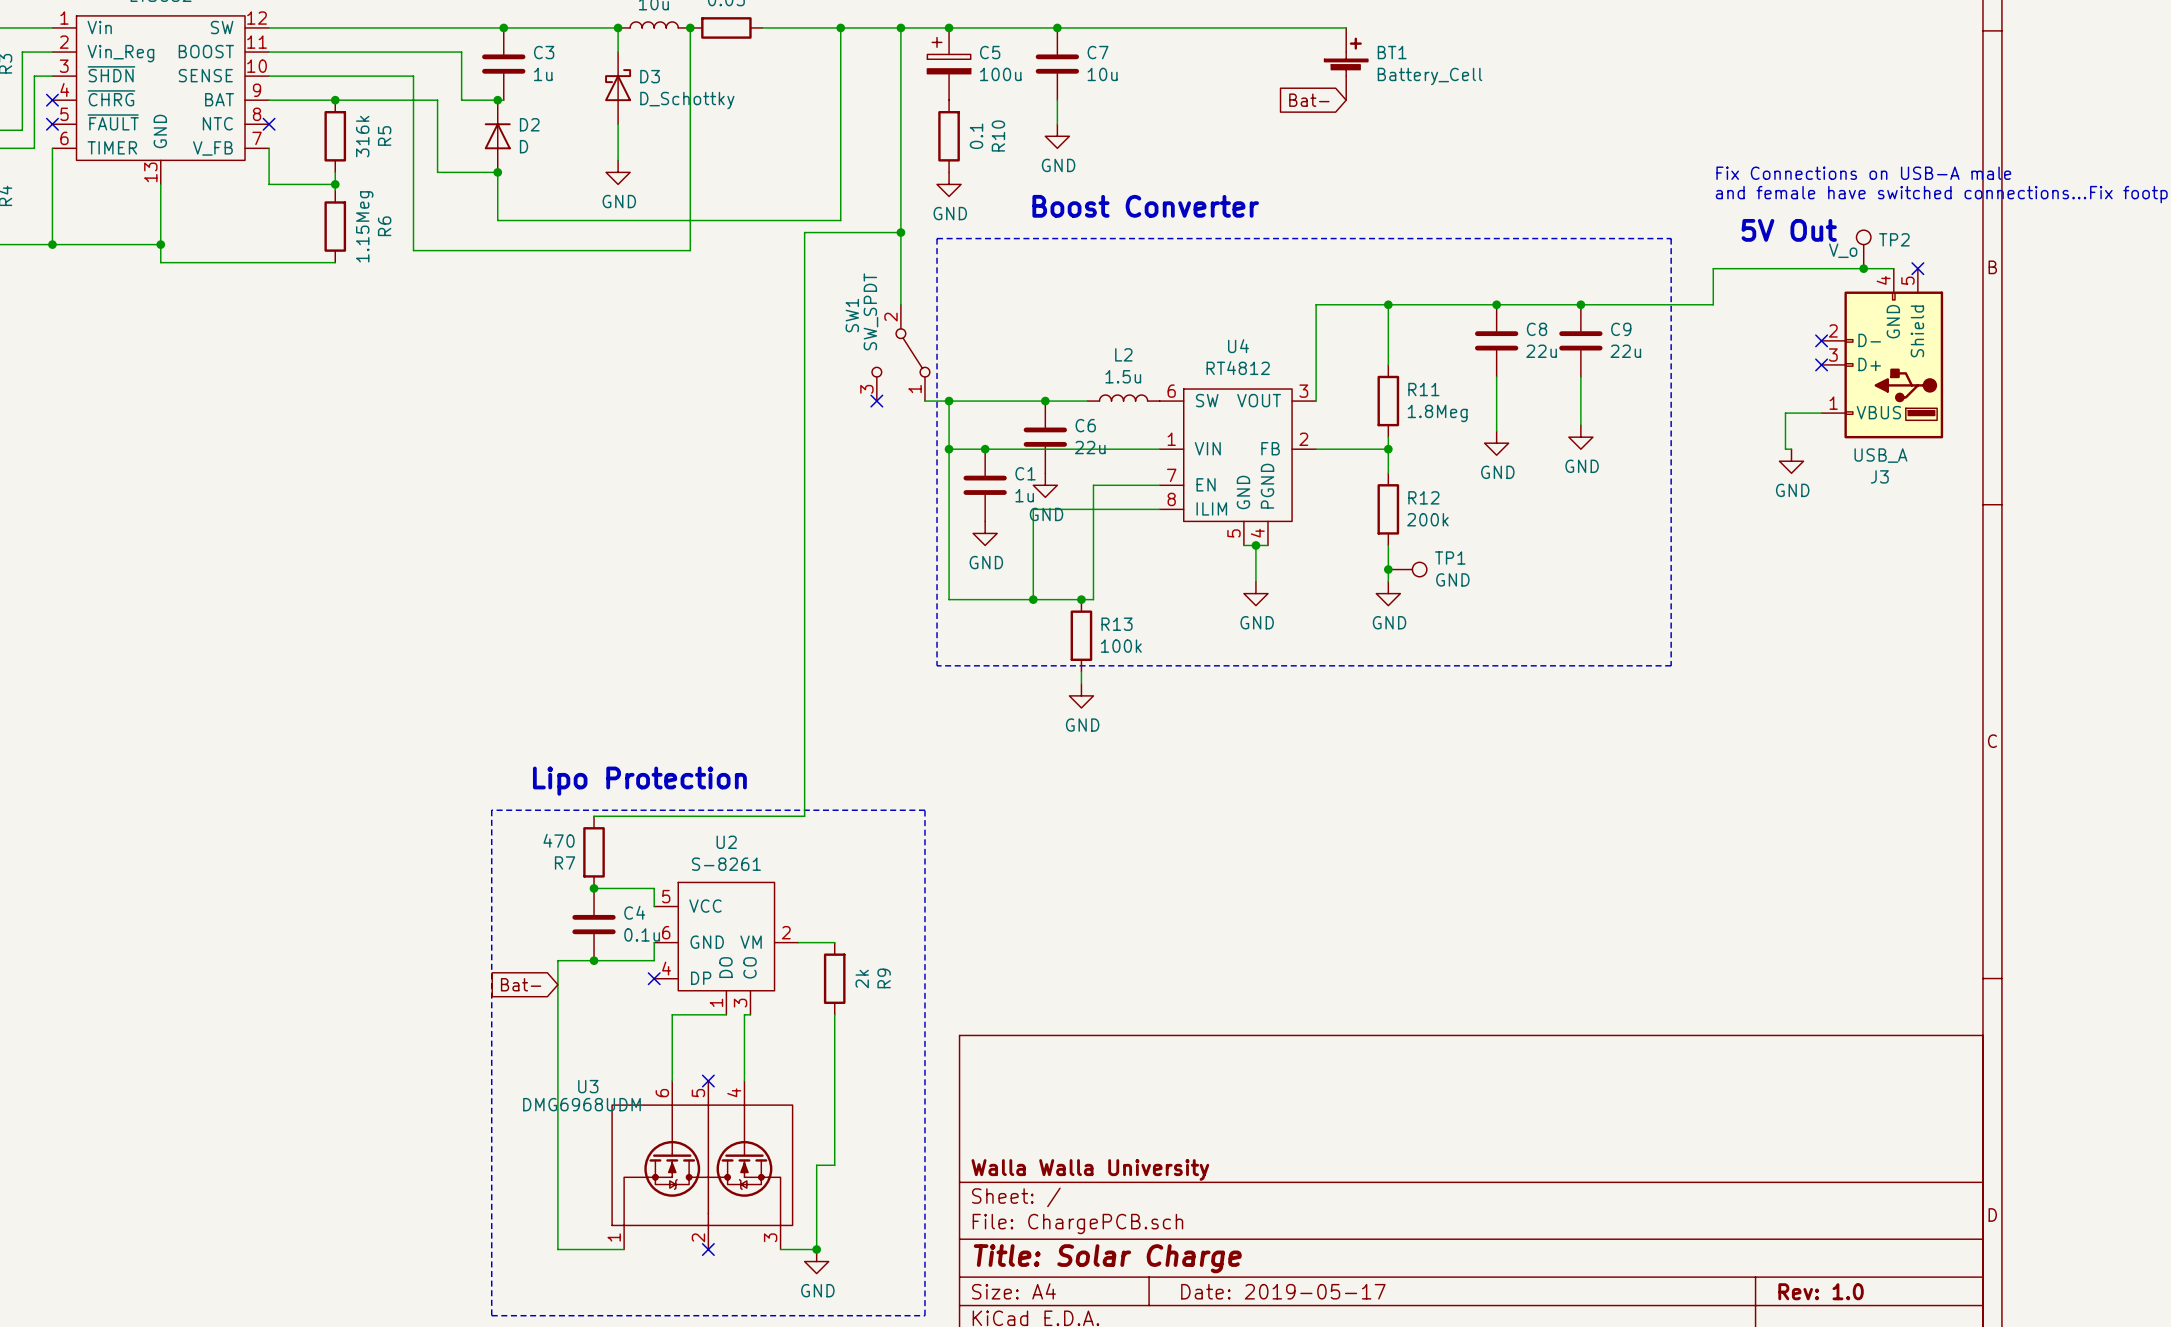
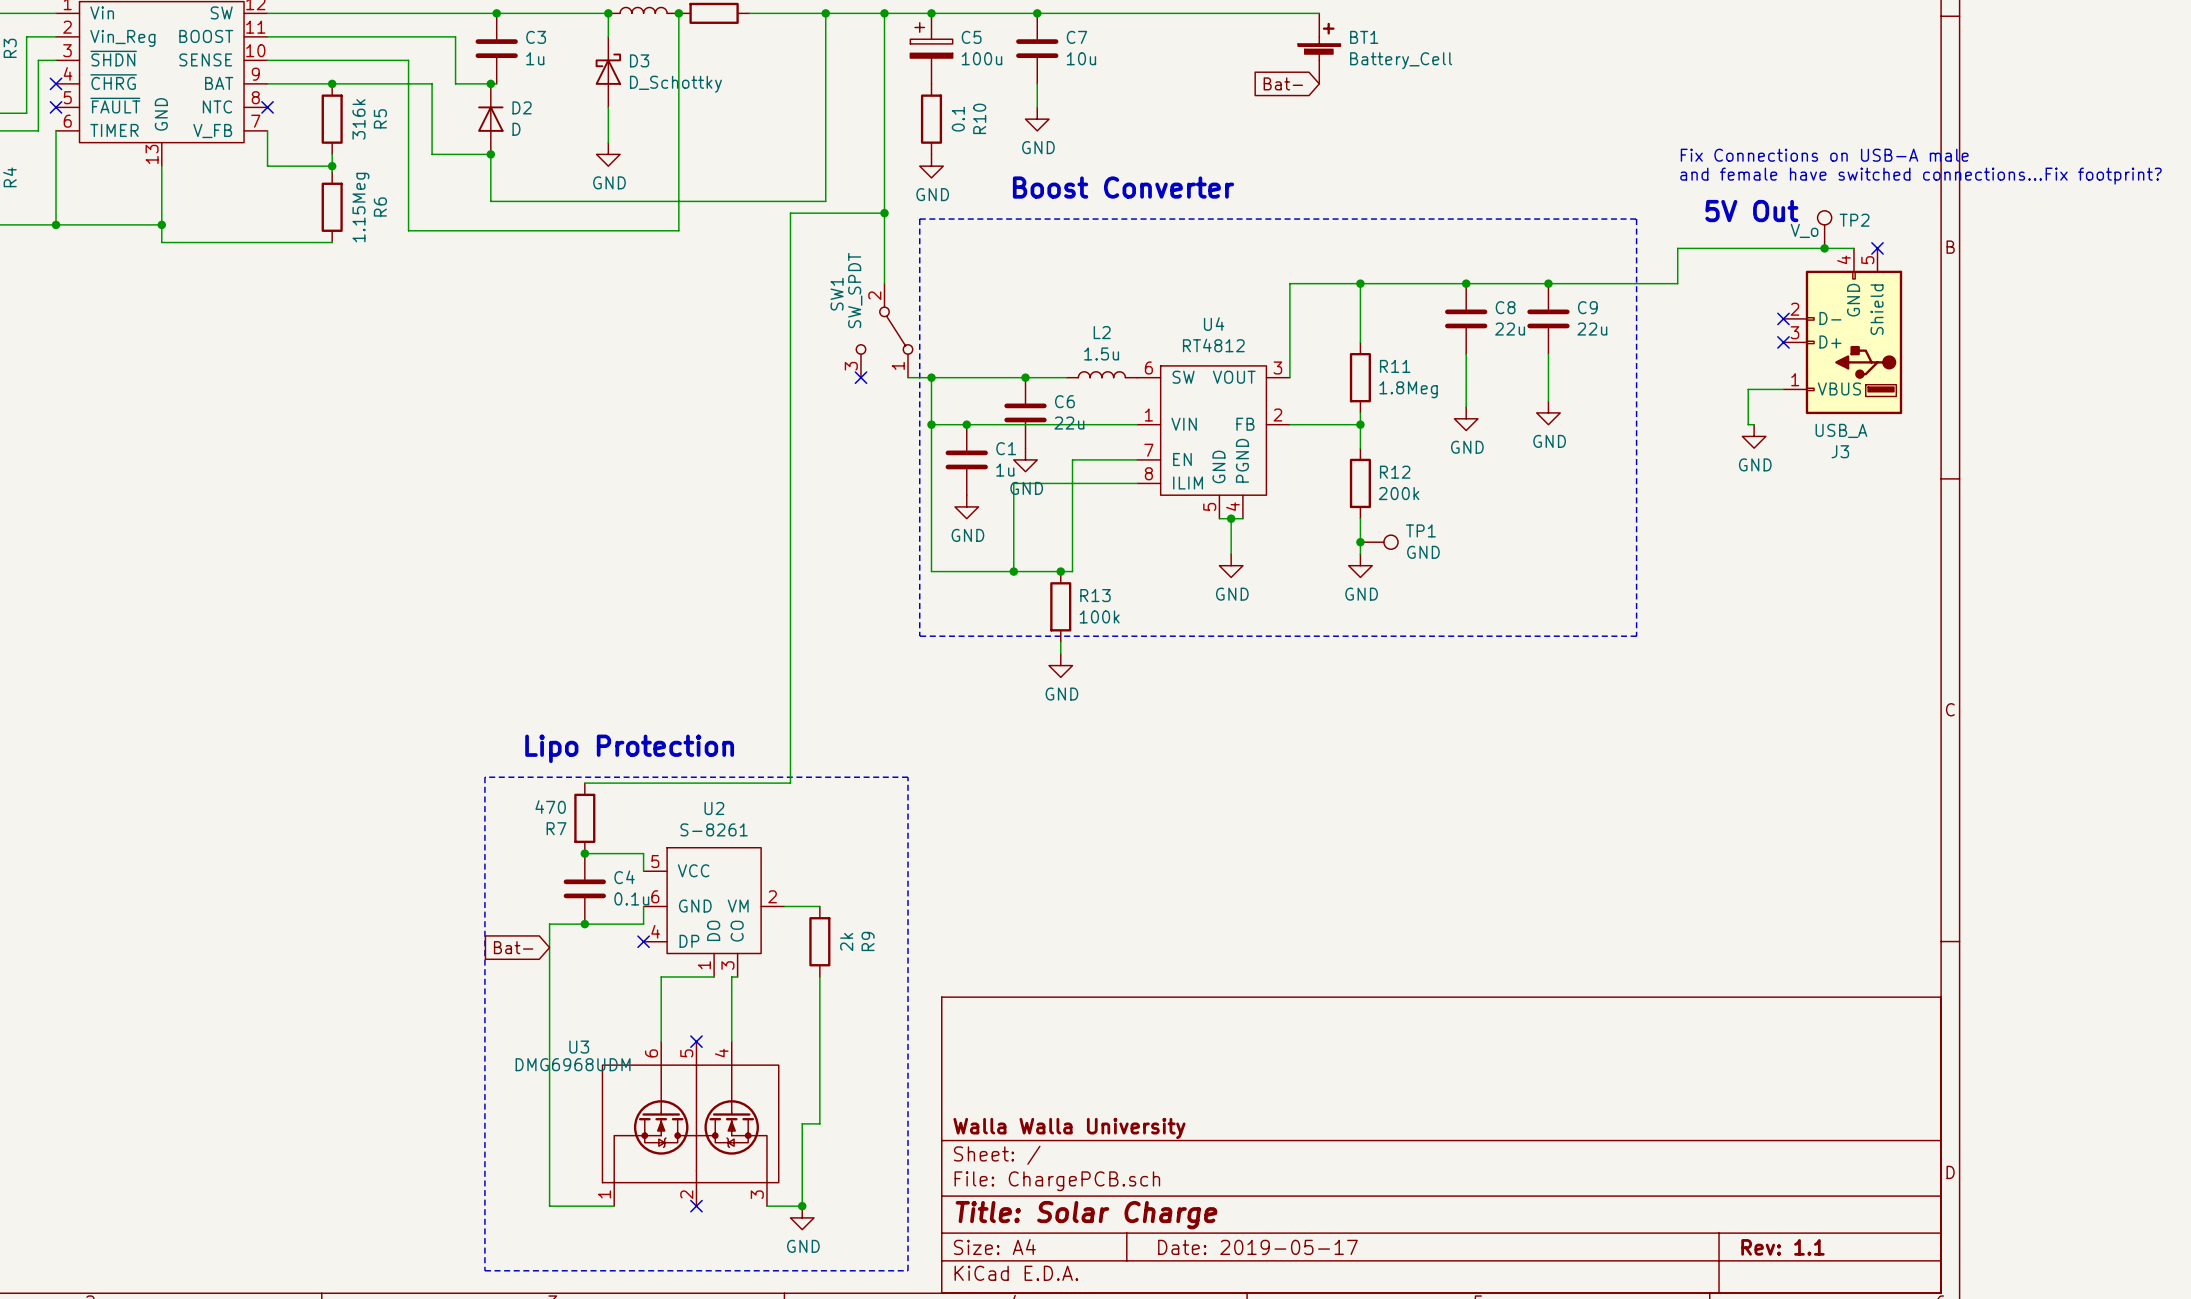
title block: Rev: 1.0 (1821, 1291) -> Rev: 1.1 (1782, 1247)

